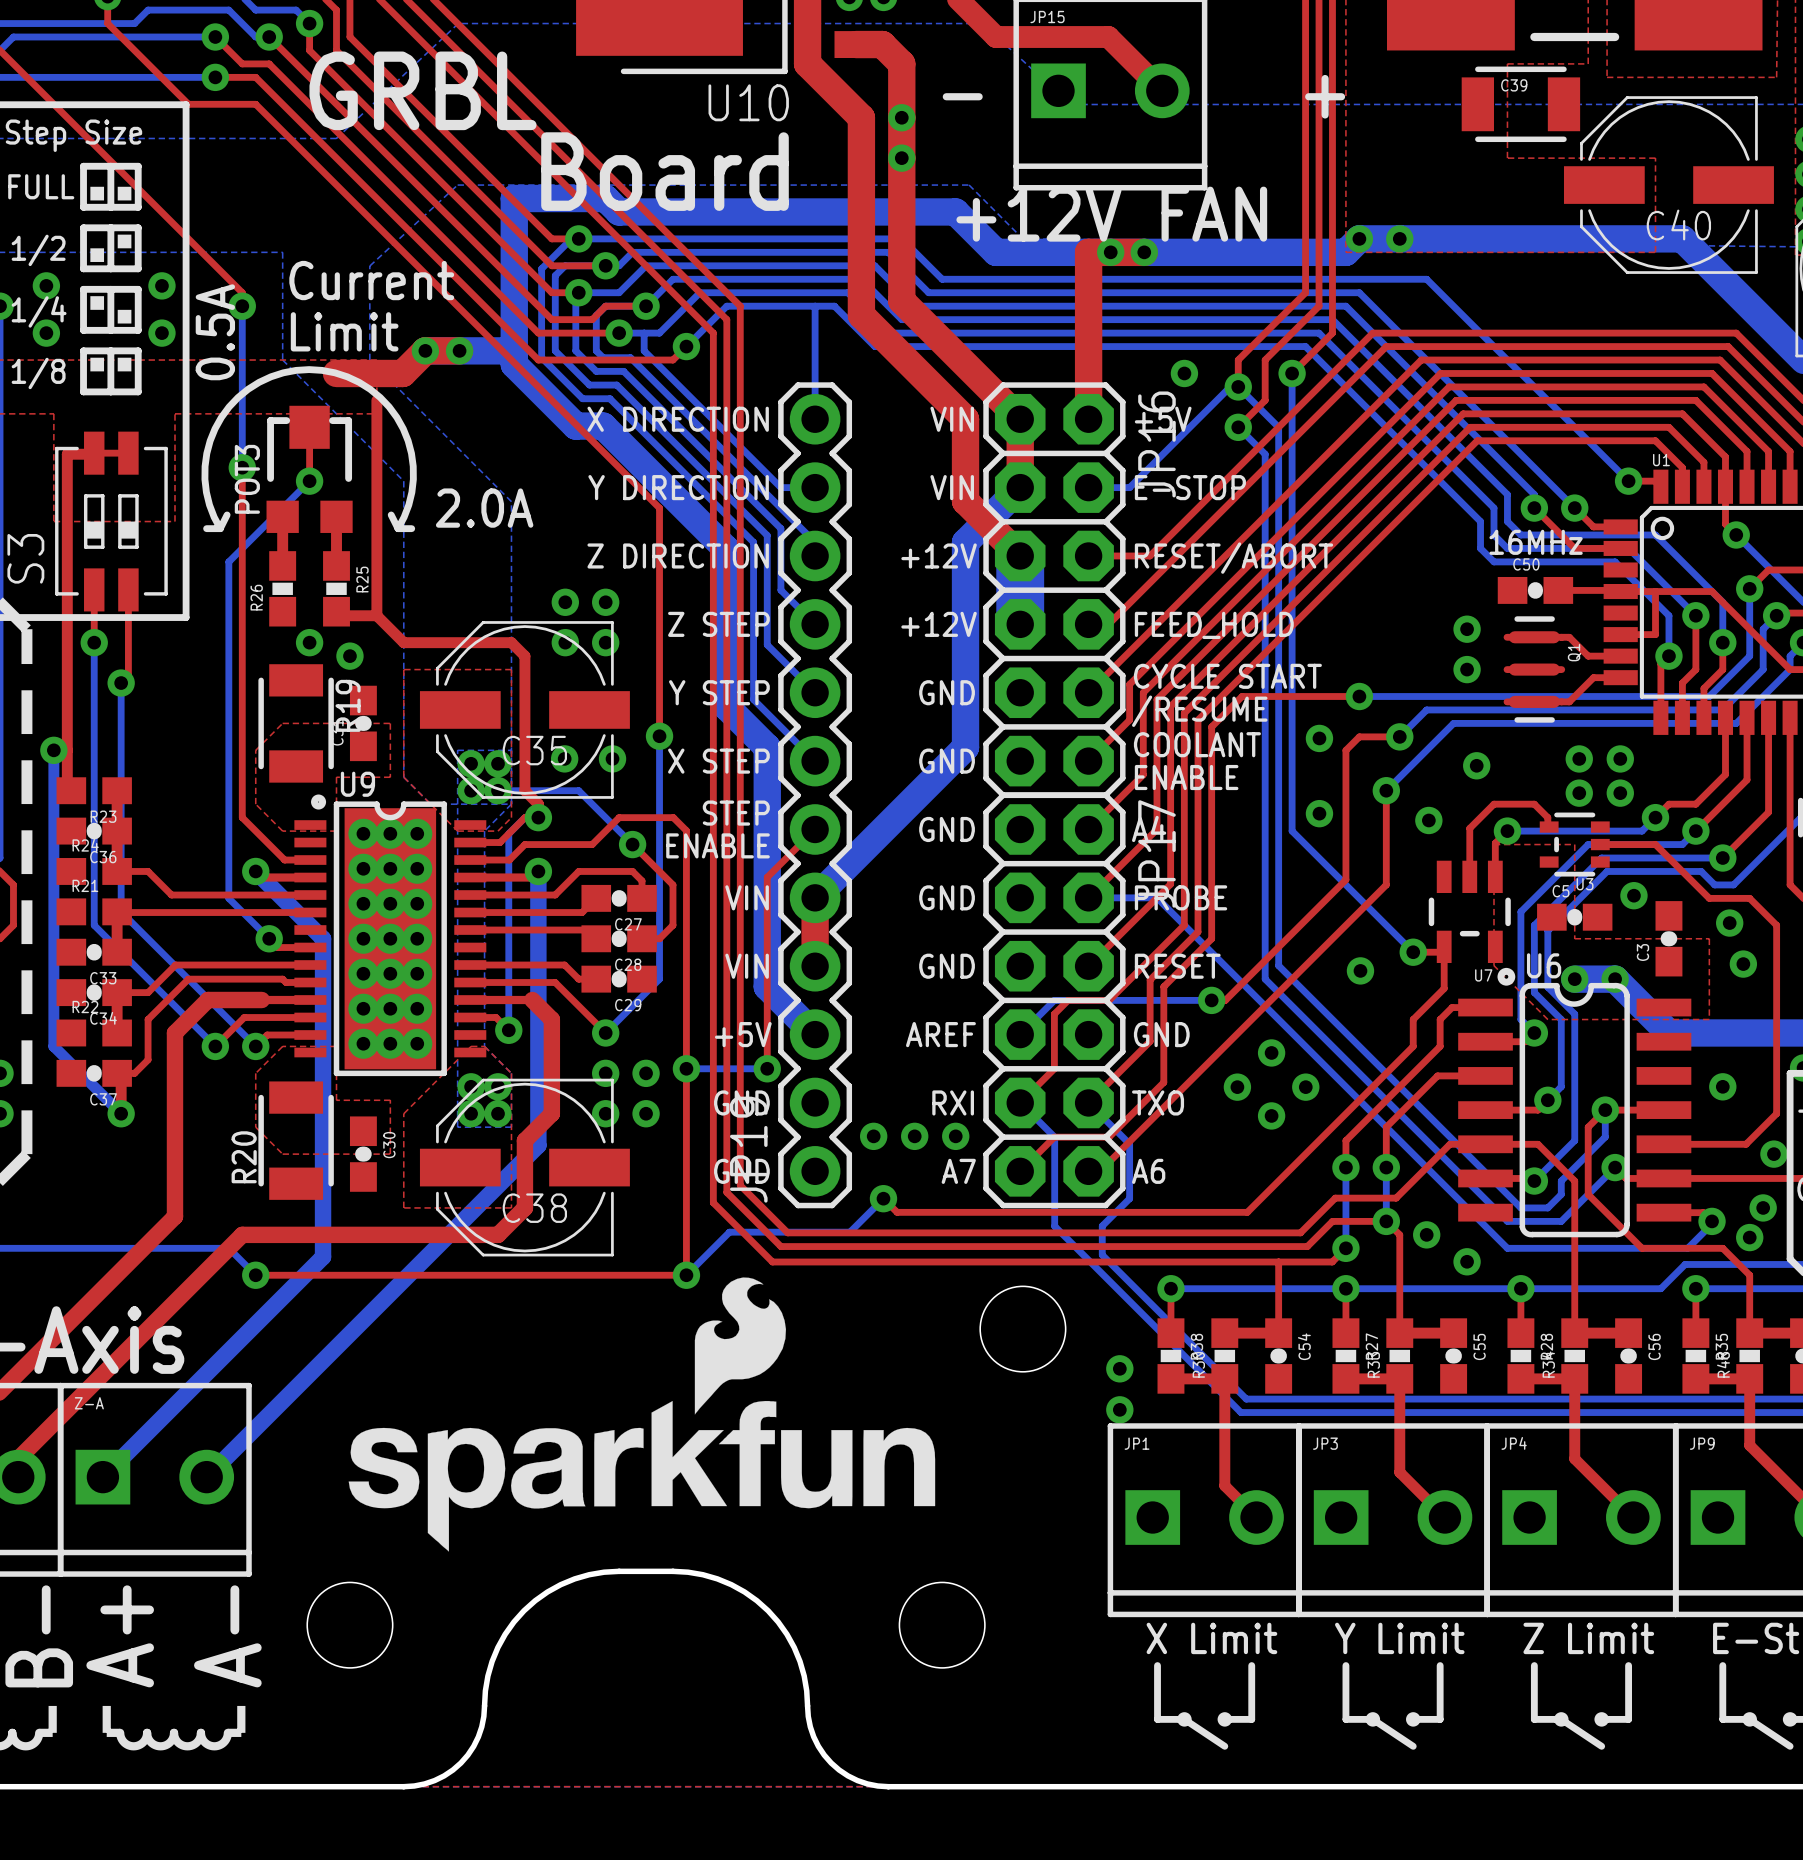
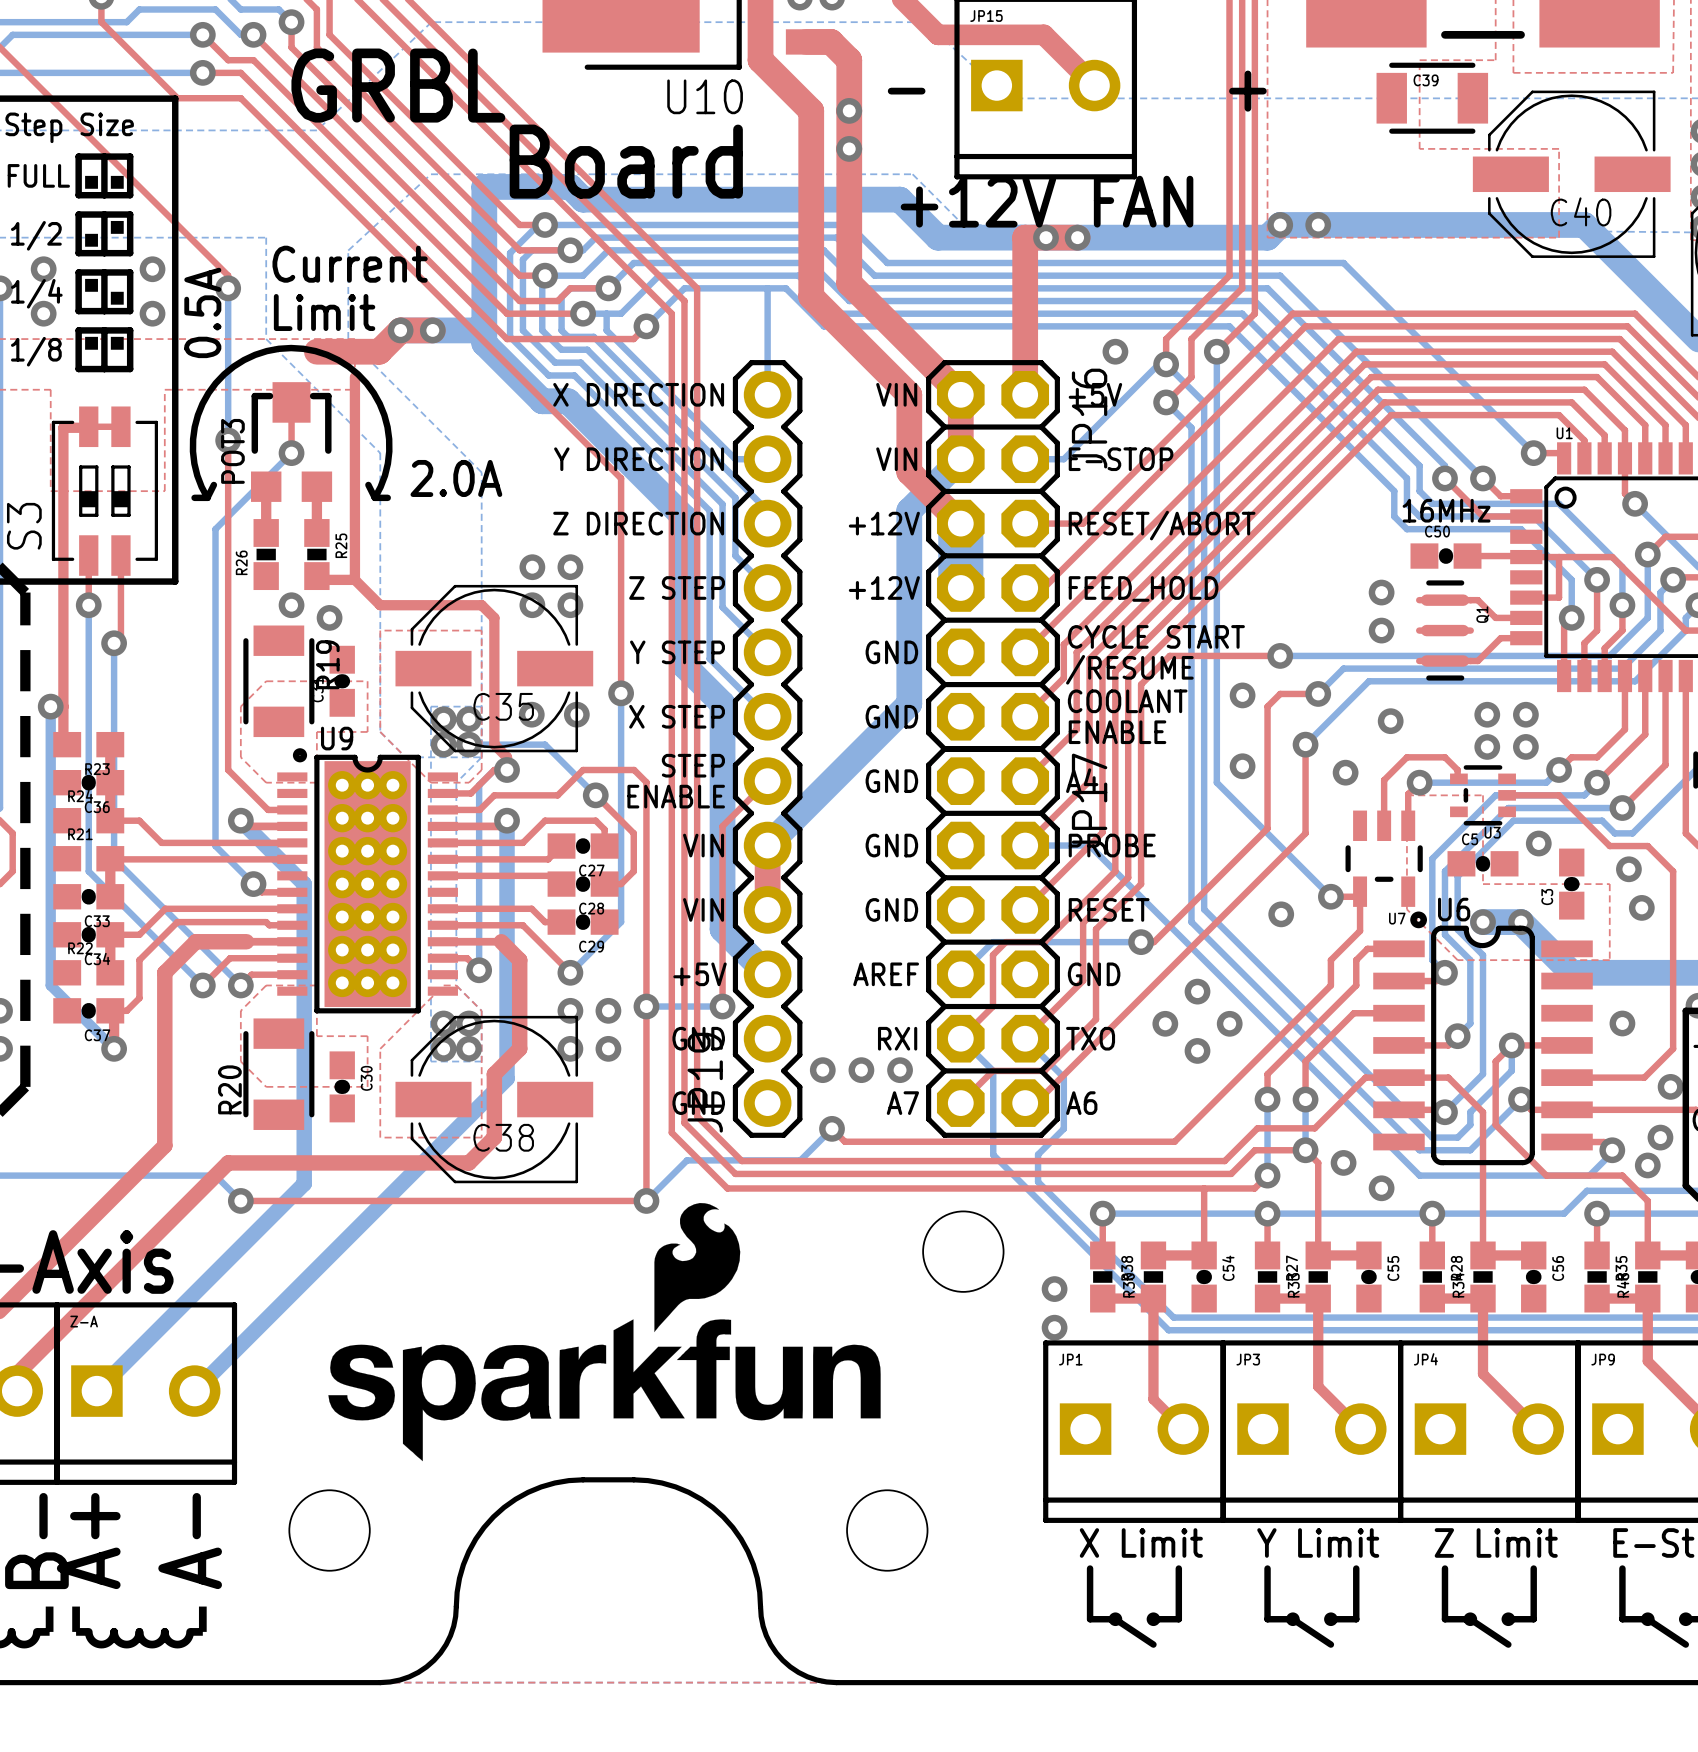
text position: A+ (120, 1636) -> A+ (88, 1541)
text position: A- (227, 1636) -> A- (190, 1541)
line: (106, 1705) (106, 1732) (120, 1732) (124, 1742) (133, 1746) (143, 1742) (147, 1732) (151, 1742) (158, 1746) (170, 1742) (174, 1732) (176, 1741) (184, 1745) (195, 1743) (200, 1732) (206, 1743) (212, 1746) (219, 1745) (225, 1741) (227, 1732) (241, 1732) (241, 1705) -> (76, 1606) (76, 1631) (88, 1631) (92, 1640) (101, 1644) (110, 1640) (114, 1631) (117, 1640) (125, 1644) (135, 1640) (139, 1631) (142, 1639) (148, 1644) (159, 1641) (164, 1631) (169, 1641) (175, 1644) (182, 1643) (187, 1639) (190, 1631) (202, 1631) (202, 1606)

